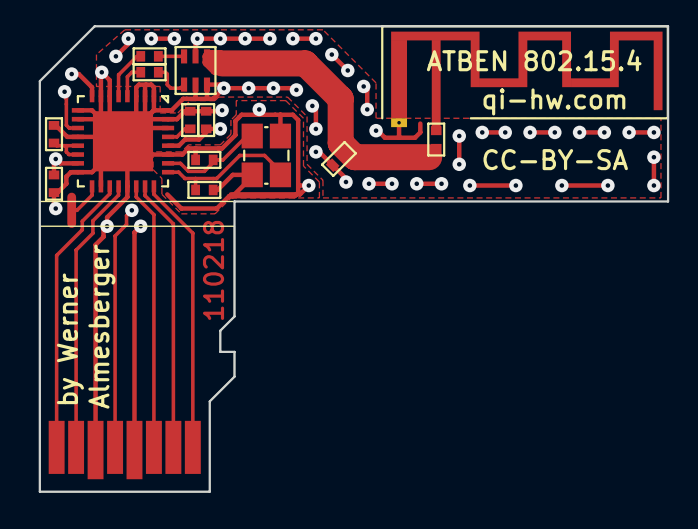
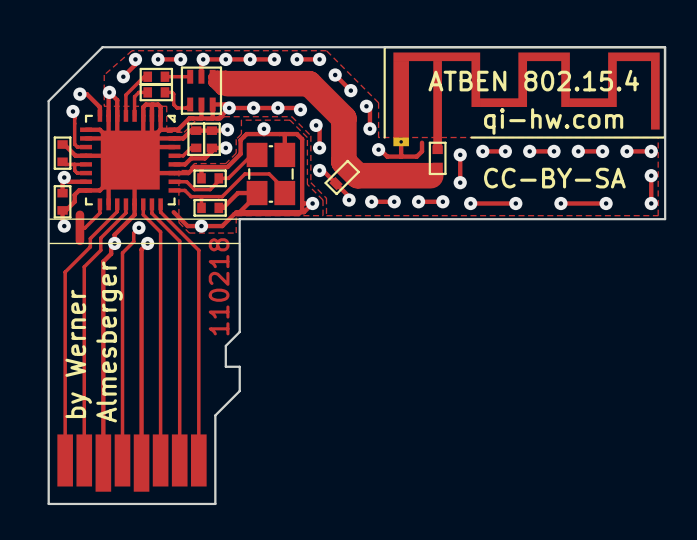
zone outline: (172, 151) (153, 151) (153, 169) (161, 178) (161, 194) (181, 213) (215, 213) (230, 197) -> (178, 170) (178, 222) (189, 233) (236, 233) (236, 215)
via: none -> (201, 226)

